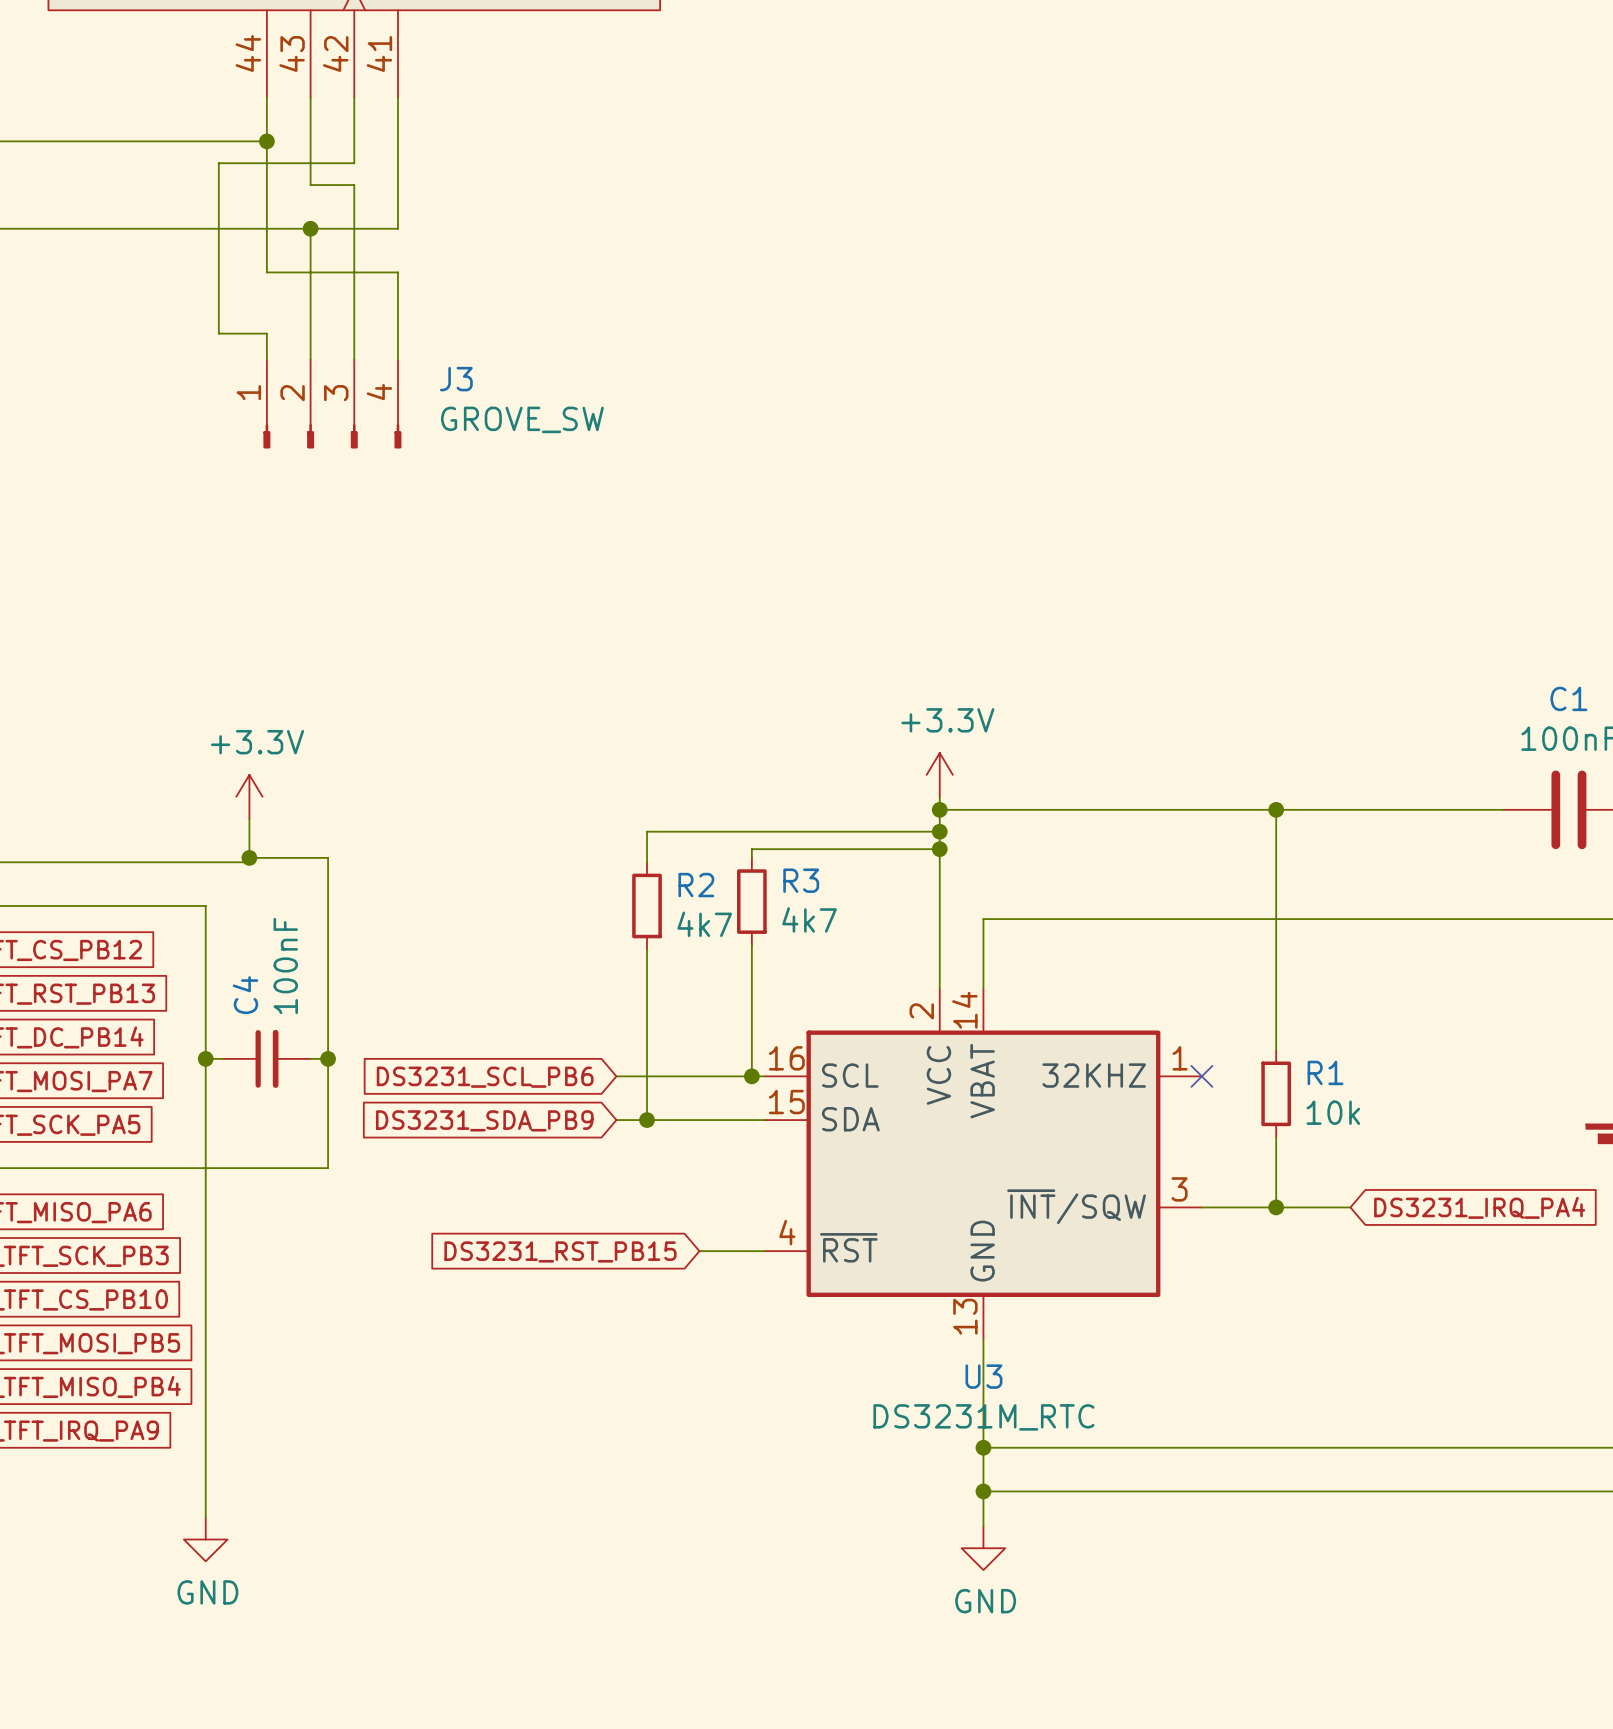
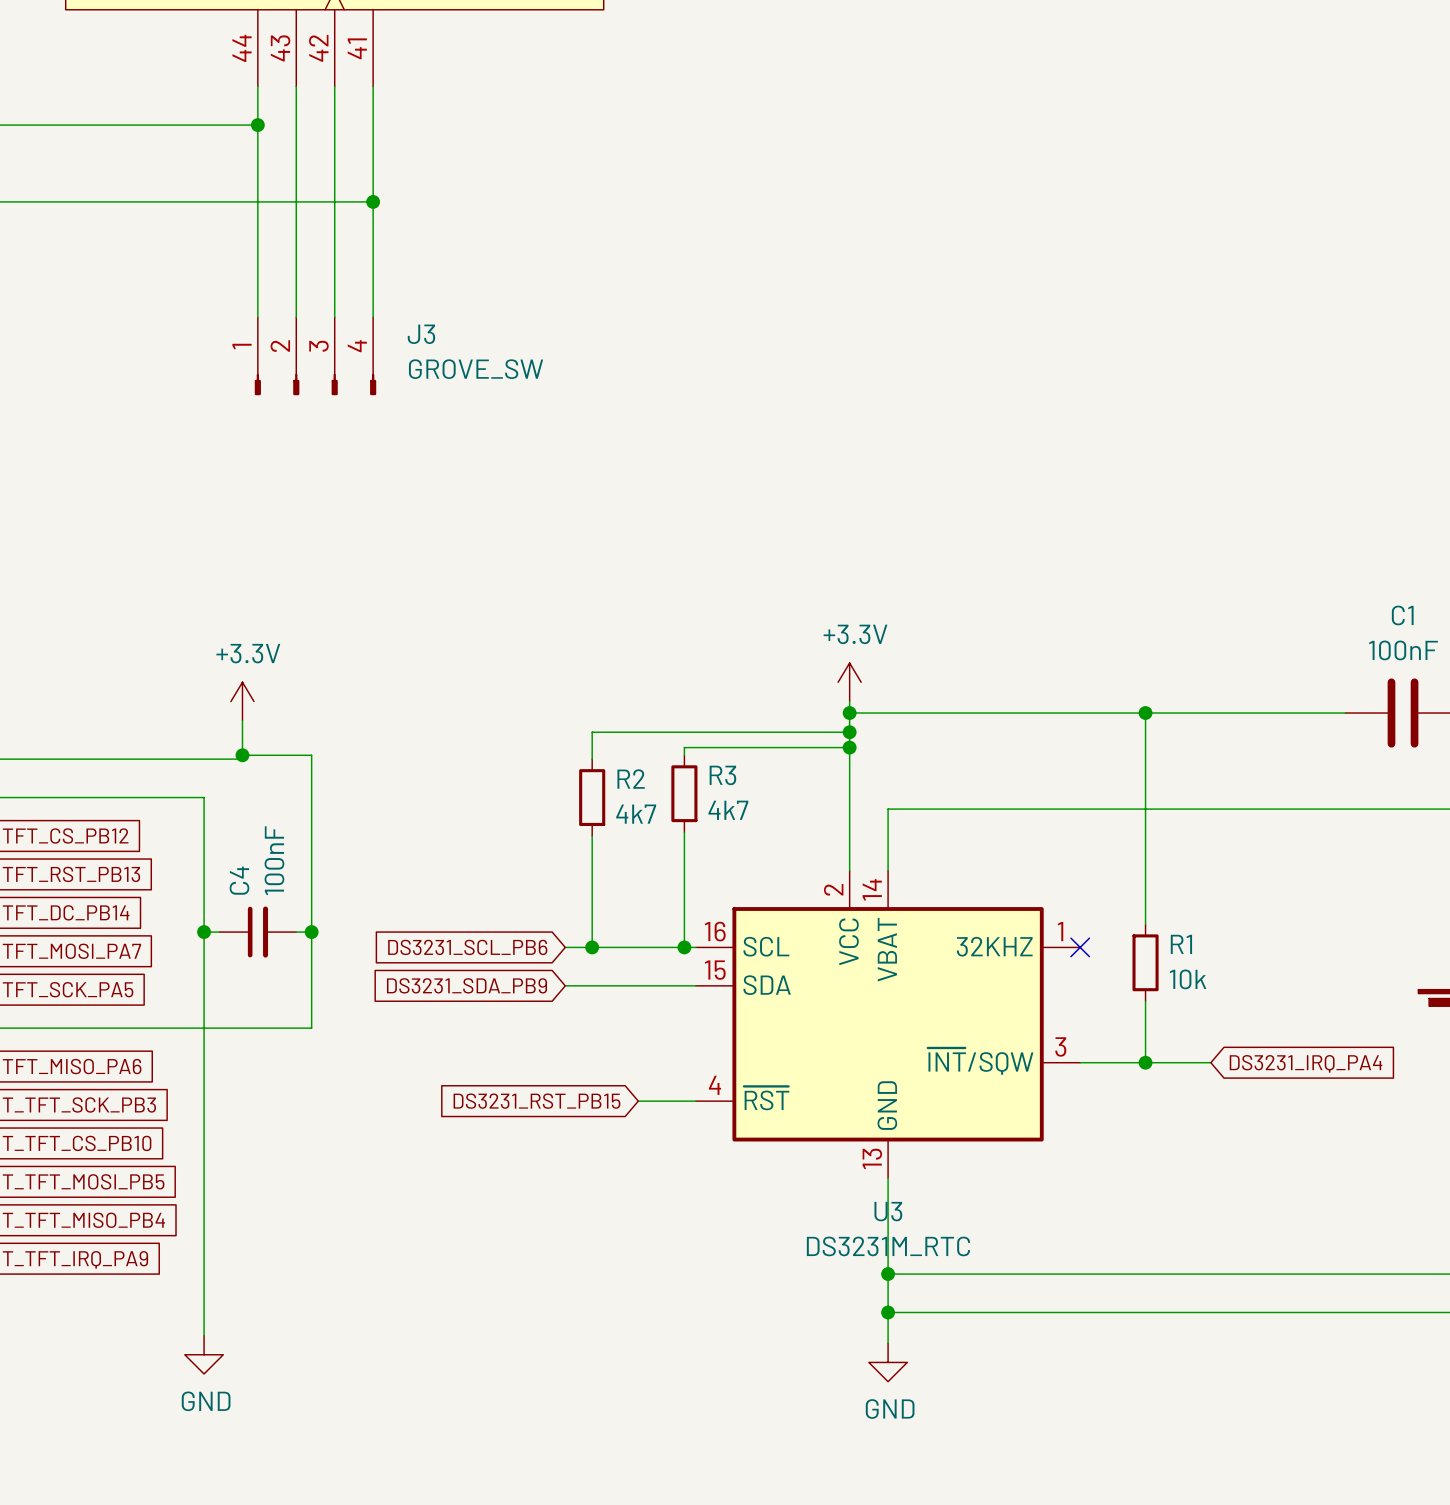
wire: (354, 163) (218, 163) (218, 333) (266, 333) -> (257, 240) (257, 294)
wire: (310, 185) (354, 185) -> (334, 144) (334, 163)
wire: none -> (296, 163) (296, 201)
junction position: (310, 228) -> (373, 201)
wire: (266, 272) (397, 272) -> (373, 201) (373, 240)
wire: (647, 1076) (647, 1120) -> none
junction position: (647, 1120) -> (592, 947)

